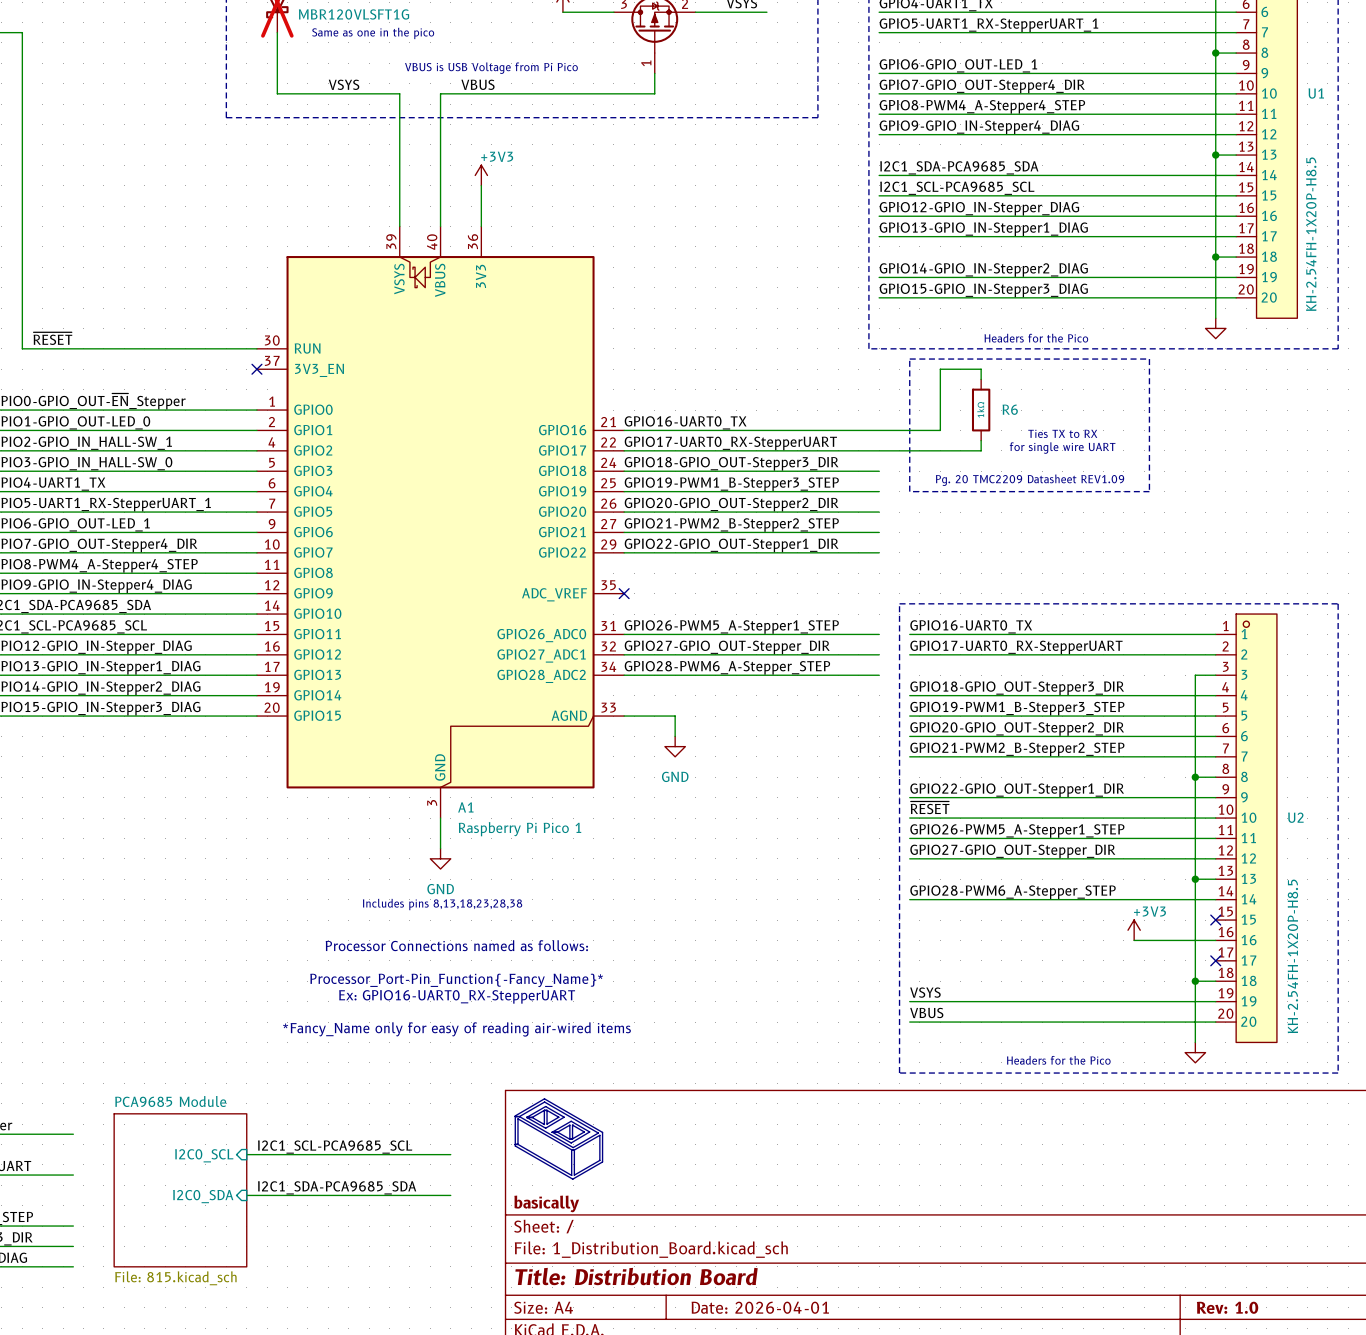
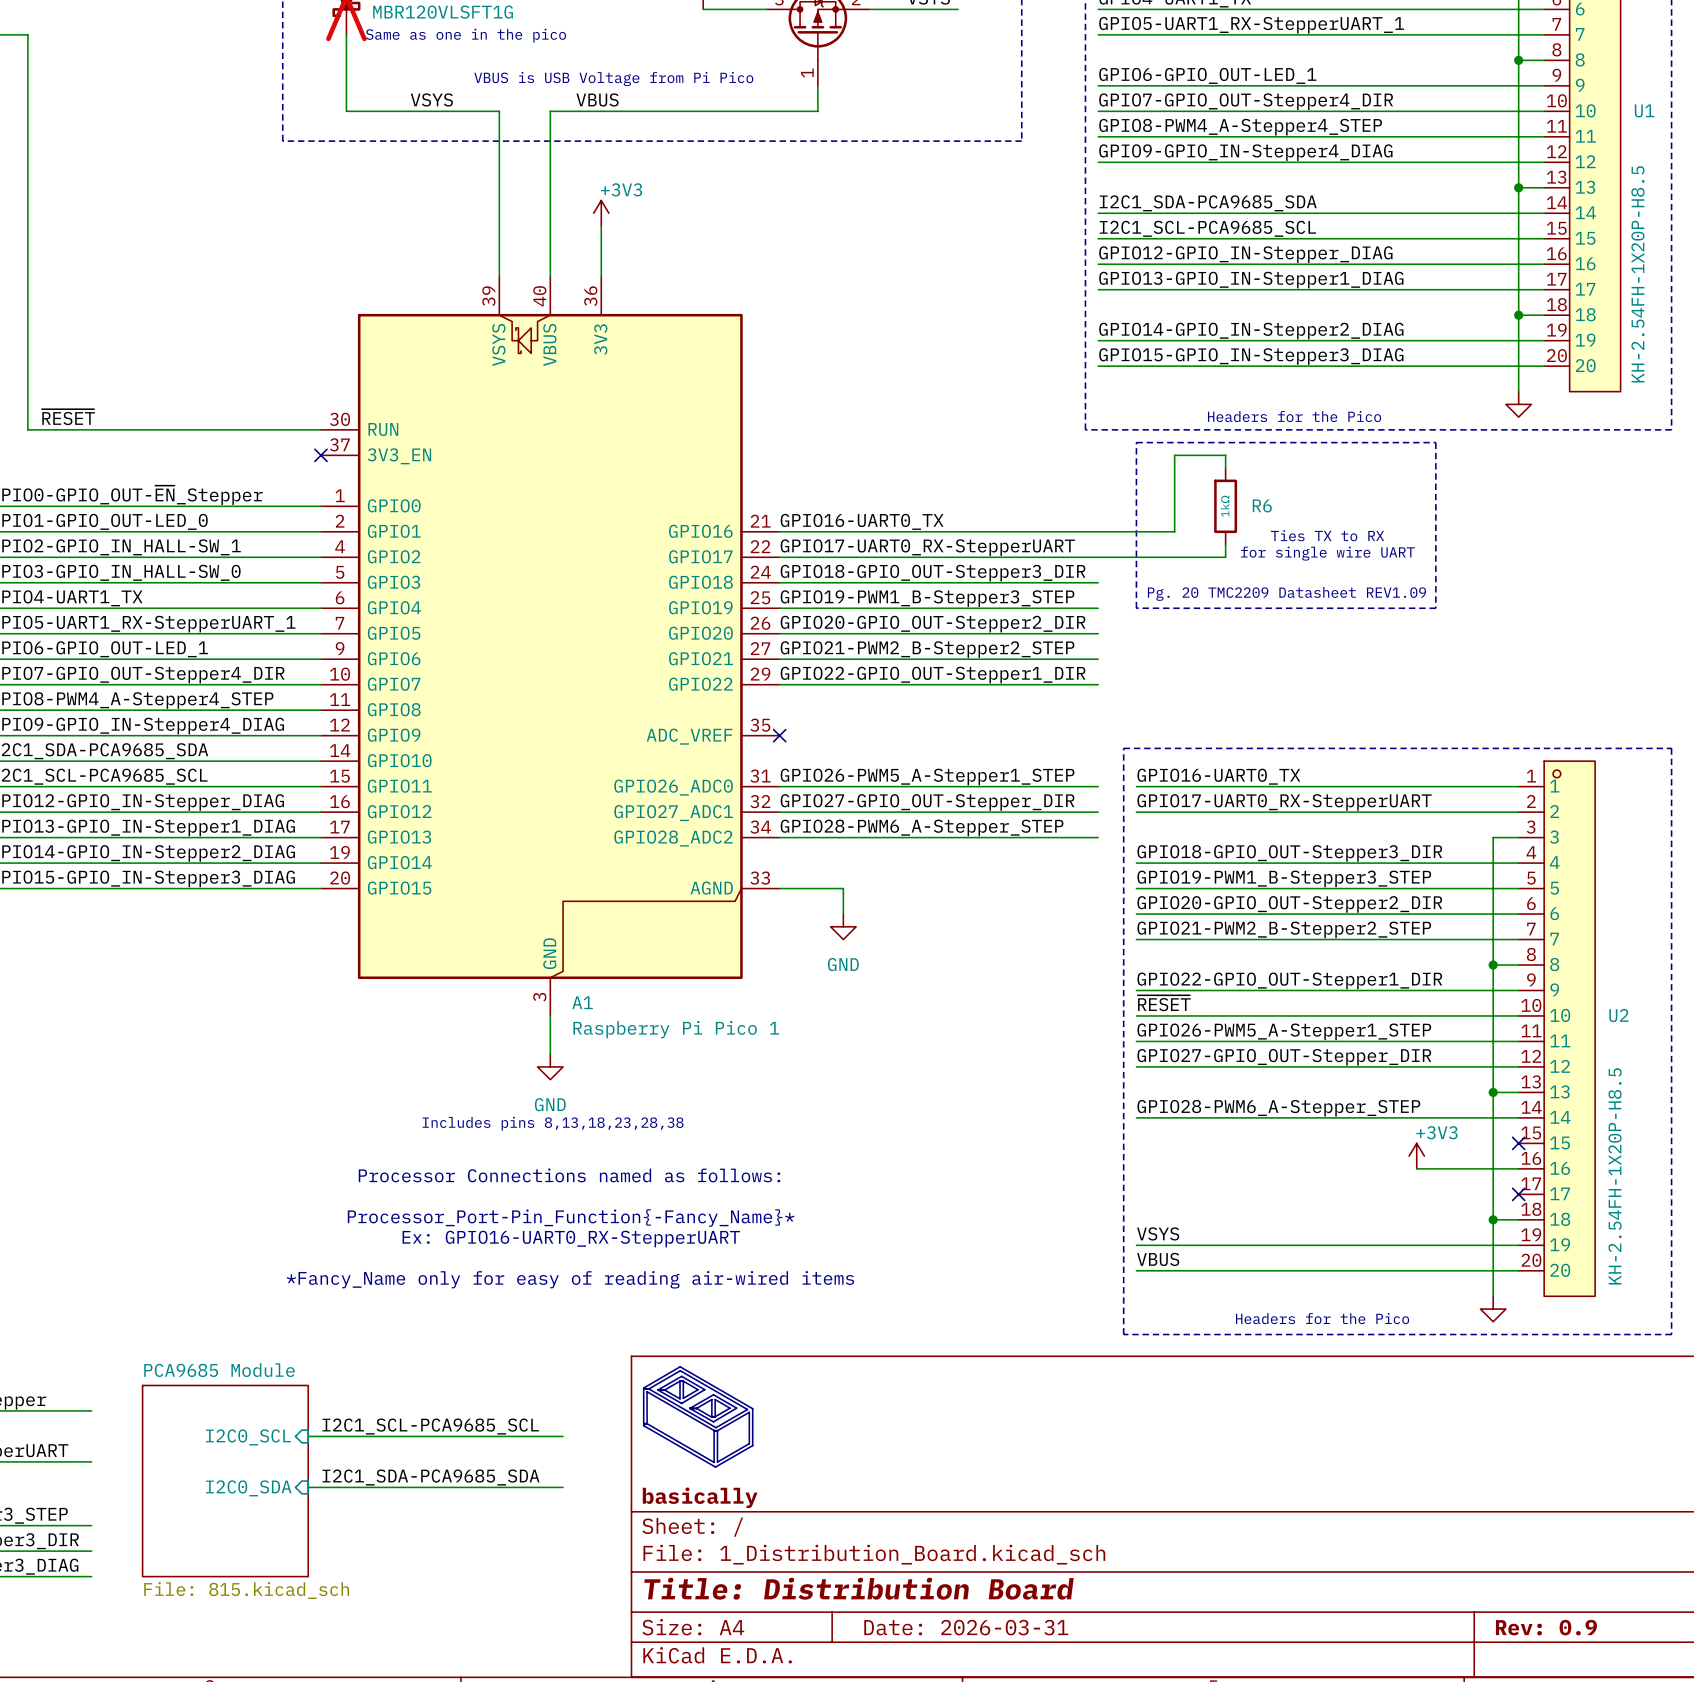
title block: Date: 2026-04-01 (760, 1307) -> Date: 2026-03-31 (966, 1627)
title block: Rev: 1.0 (1227, 1307) -> Rev: 0.9 (1546, 1627)

